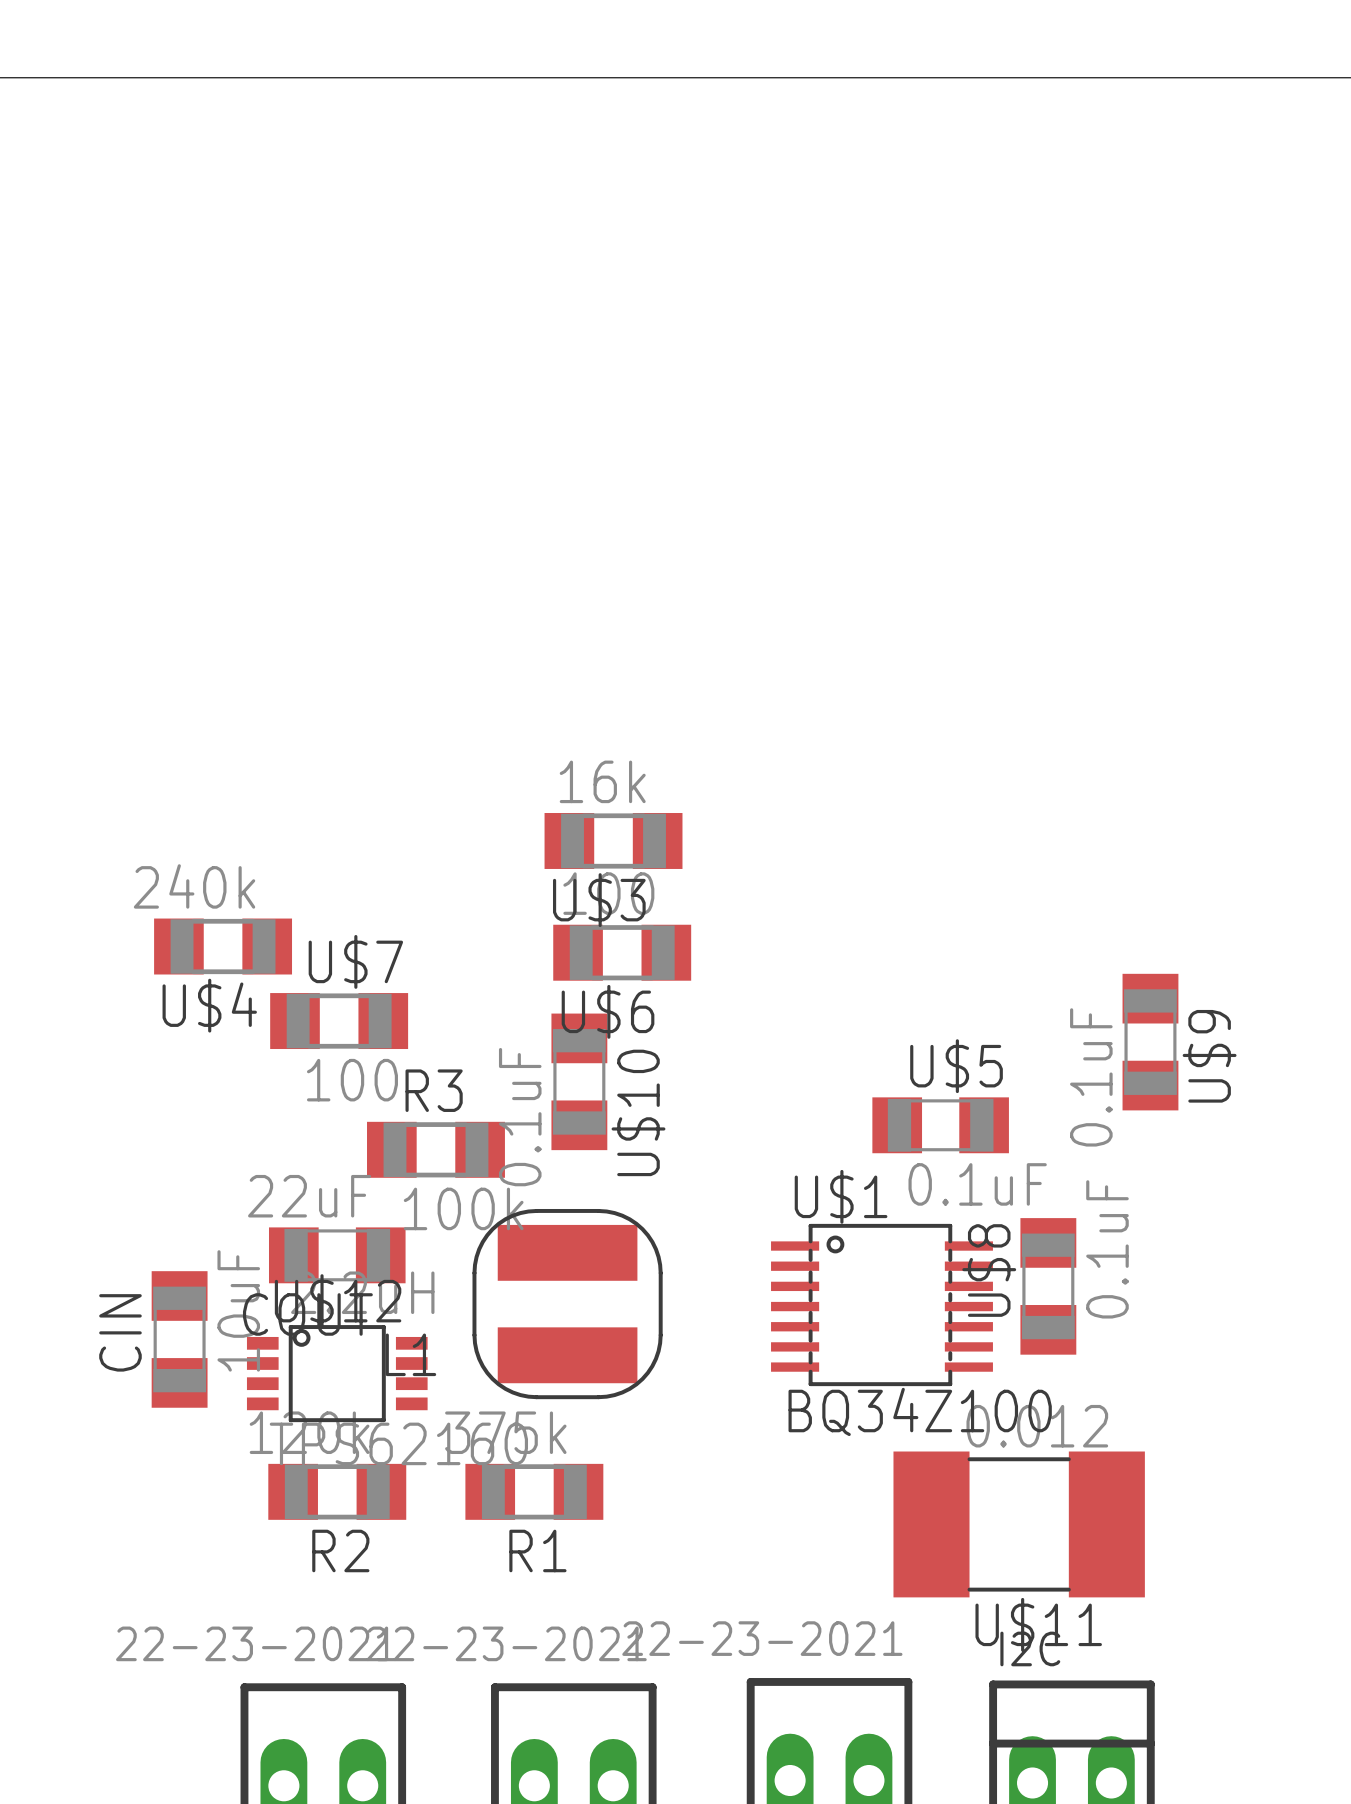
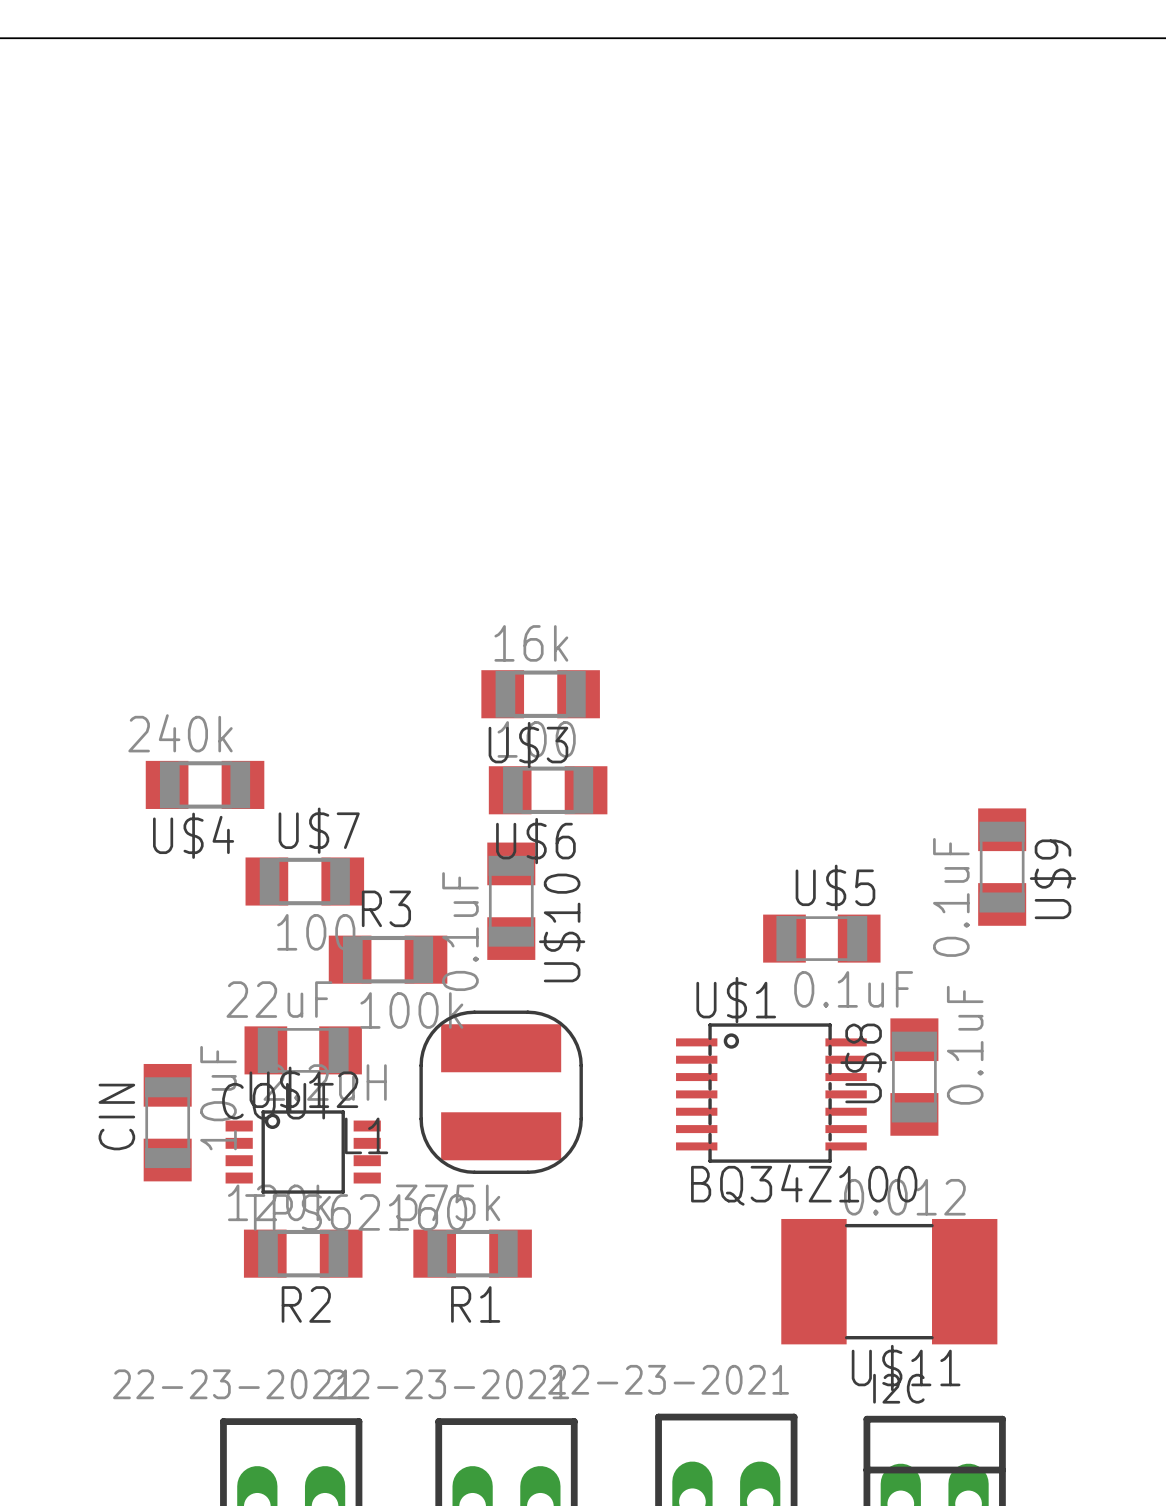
U$7 position: (339, 1021) -> (304, 881)

